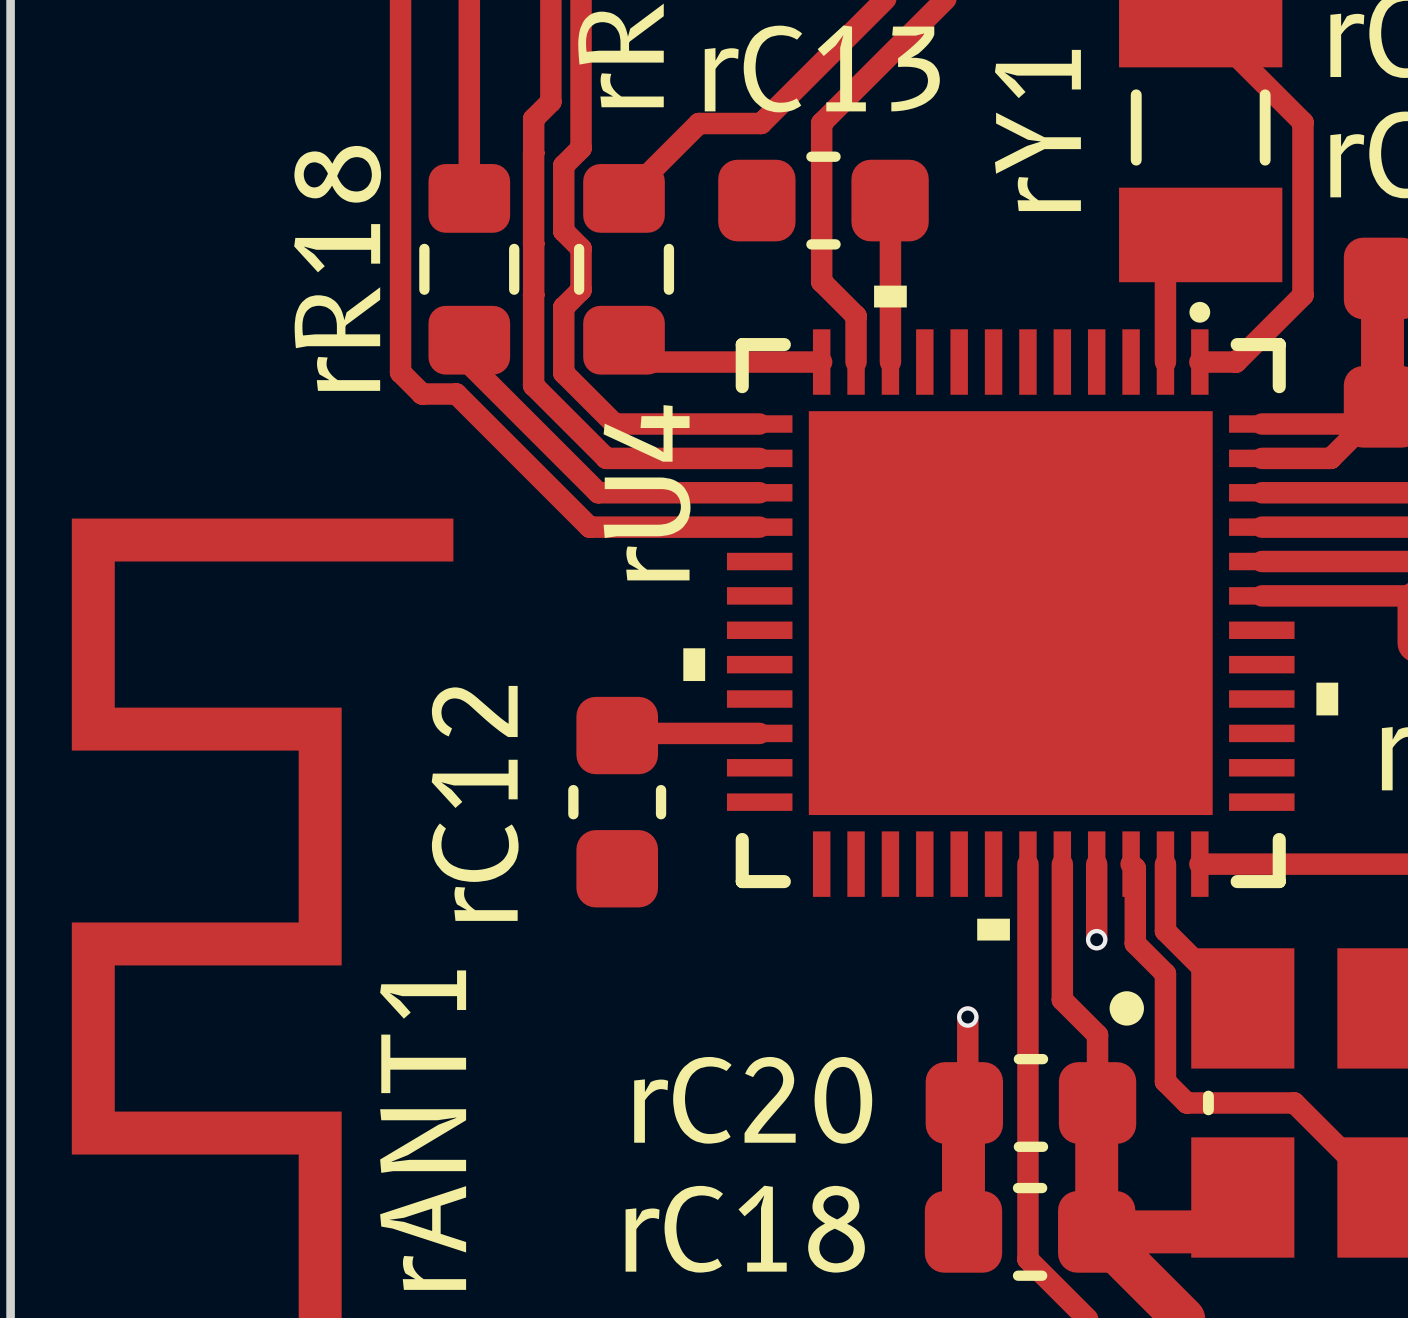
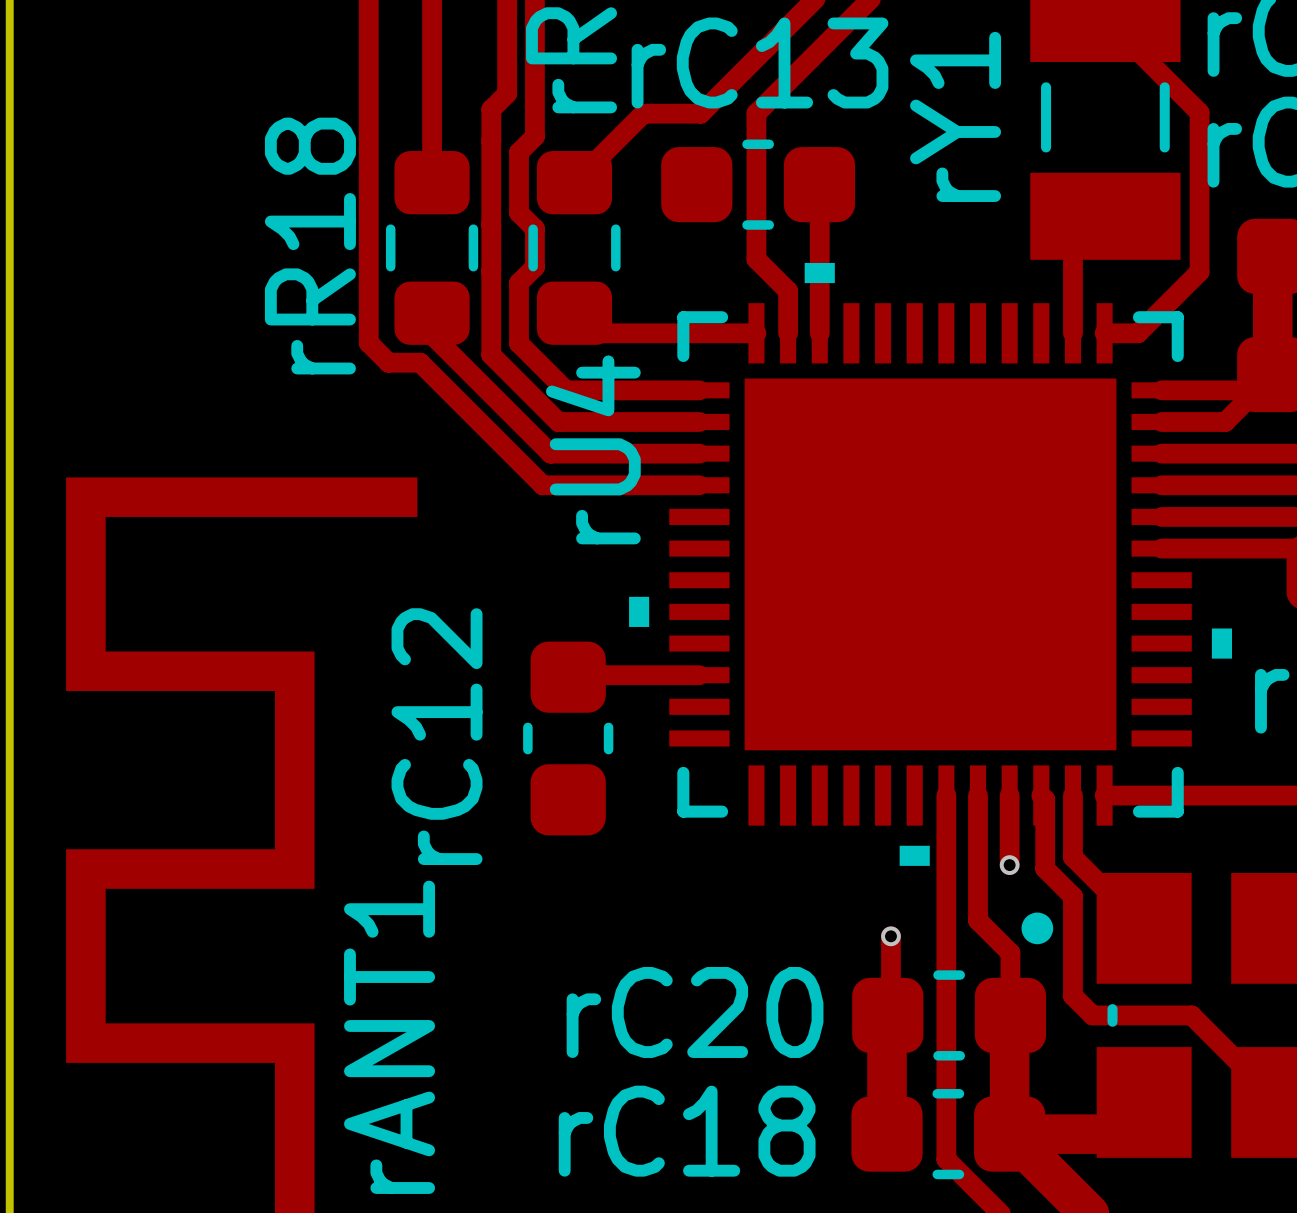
rU4 footprint: [683, 285, 1339, 941] -> [629, 262, 1232, 866]

